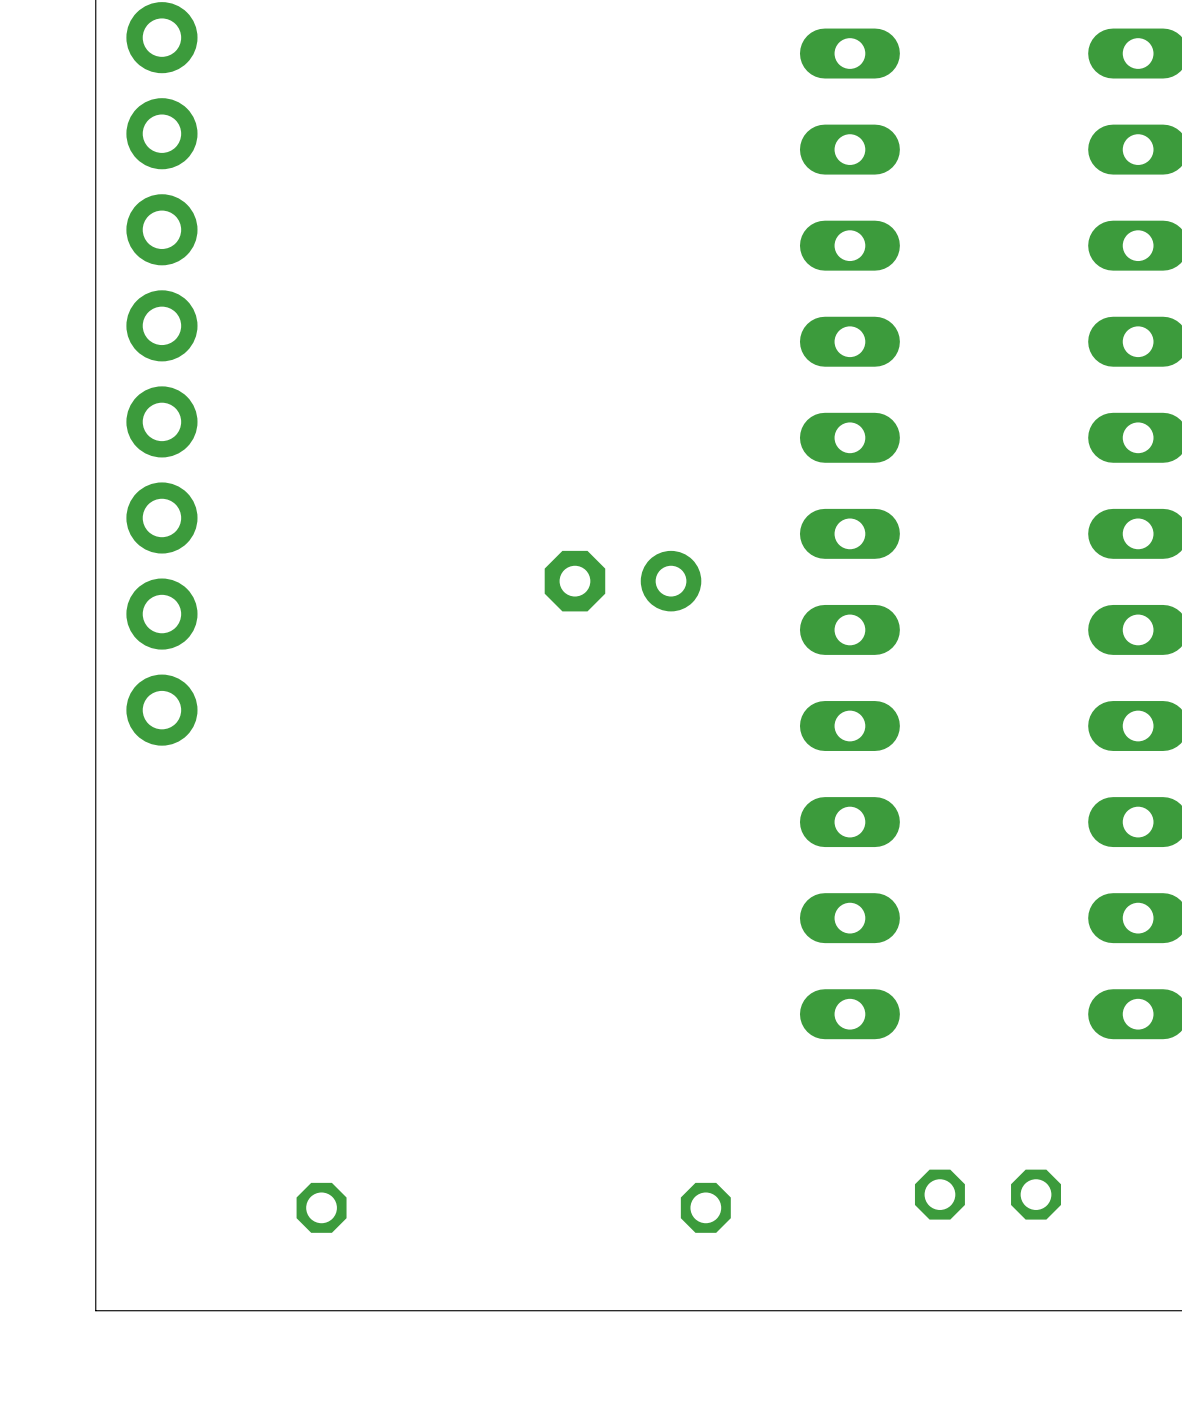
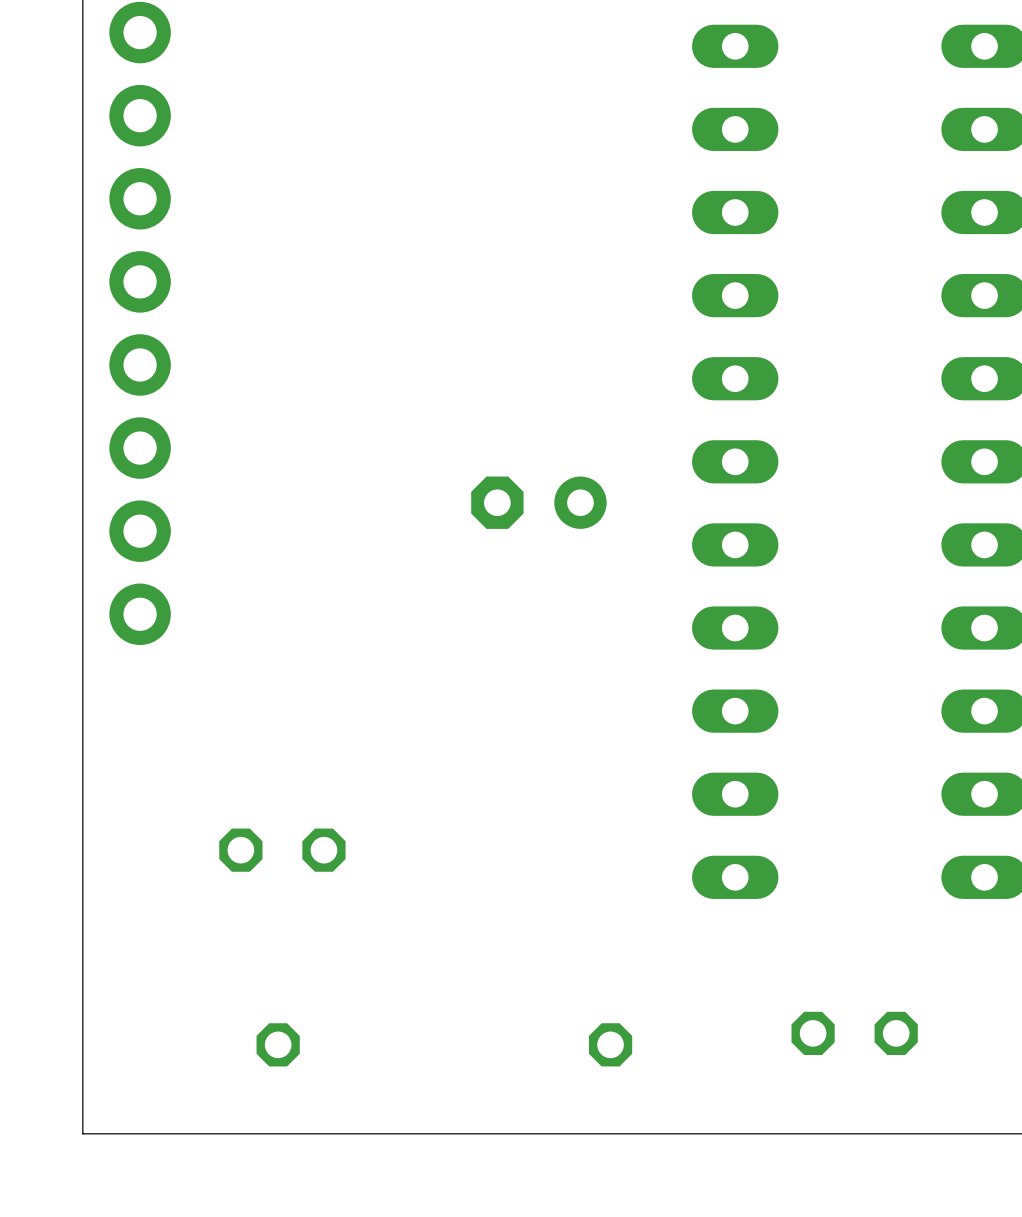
part: none -> (282, 850)

